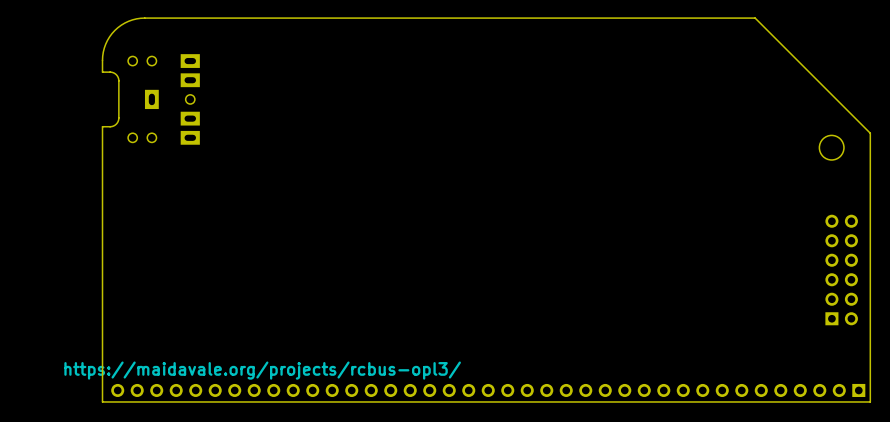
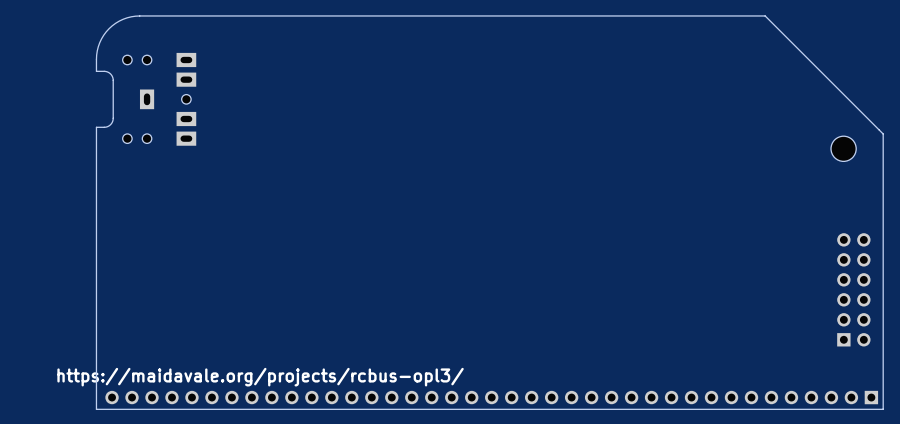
part position: (841, 270) -> (853, 289)

